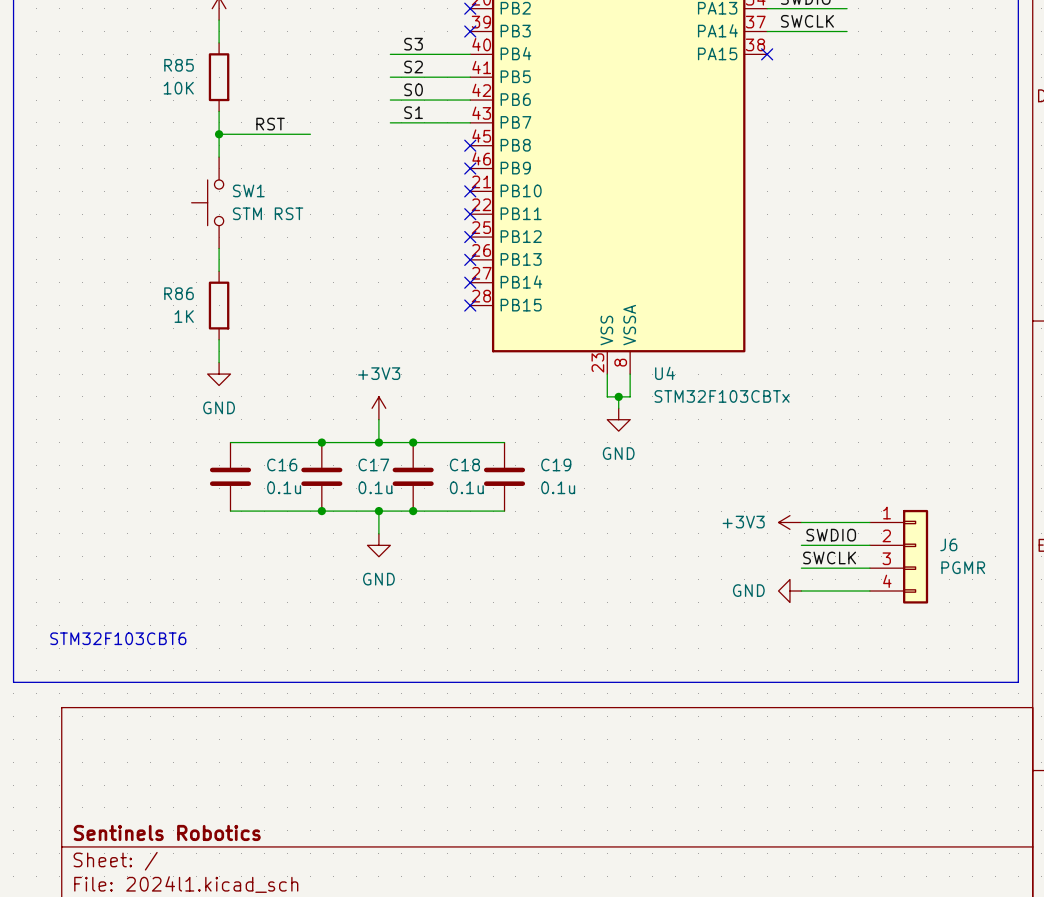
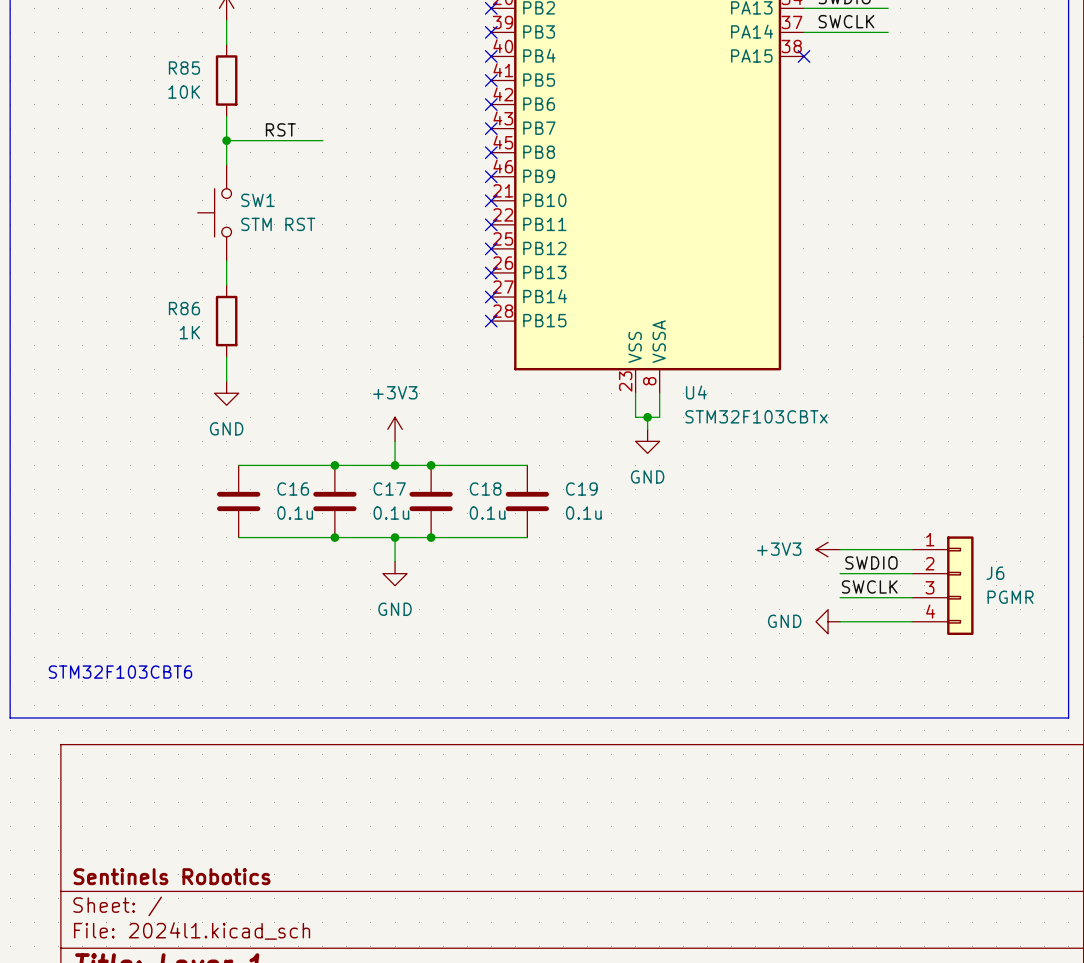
label: S3 (413, 44) -> none
wire: (390, 54) (470, 54) -> none
no-connect mark: none -> (491, 56)
label: S2 (413, 66) -> none
wire: (390, 77) (470, 77) -> none
no-connect mark: none -> (491, 80)
label: S0 (413, 89) -> none
wire: (390, 100) (470, 100) -> none
no-connect mark: none -> (491, 104)
label: S1 (413, 112) -> none
wire: (390, 122) (470, 122) -> none
no-connect mark: none -> (491, 128)

